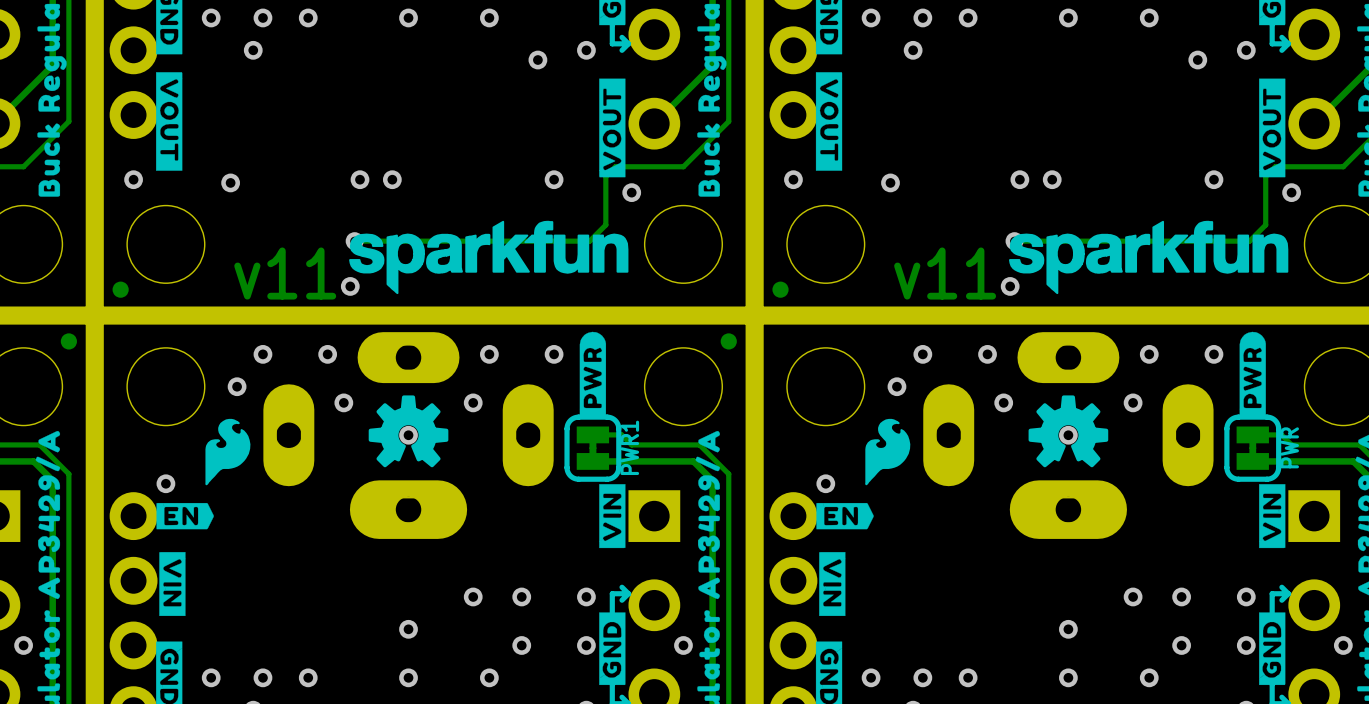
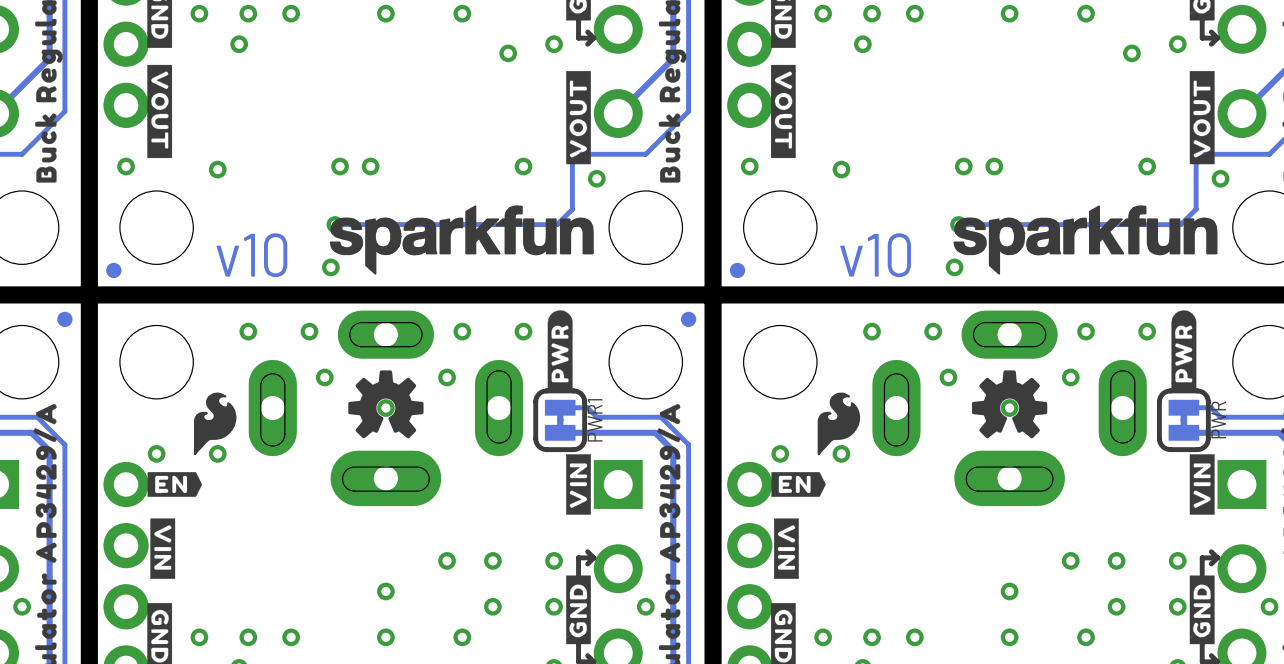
text: v11 (285, 273) -> v10 (251, 255)
text: v11 (945, 273) -> v10 (875, 255)
via position: (237, 386) -> (217, 453)
via position: (896, 386) -> (841, 453)

